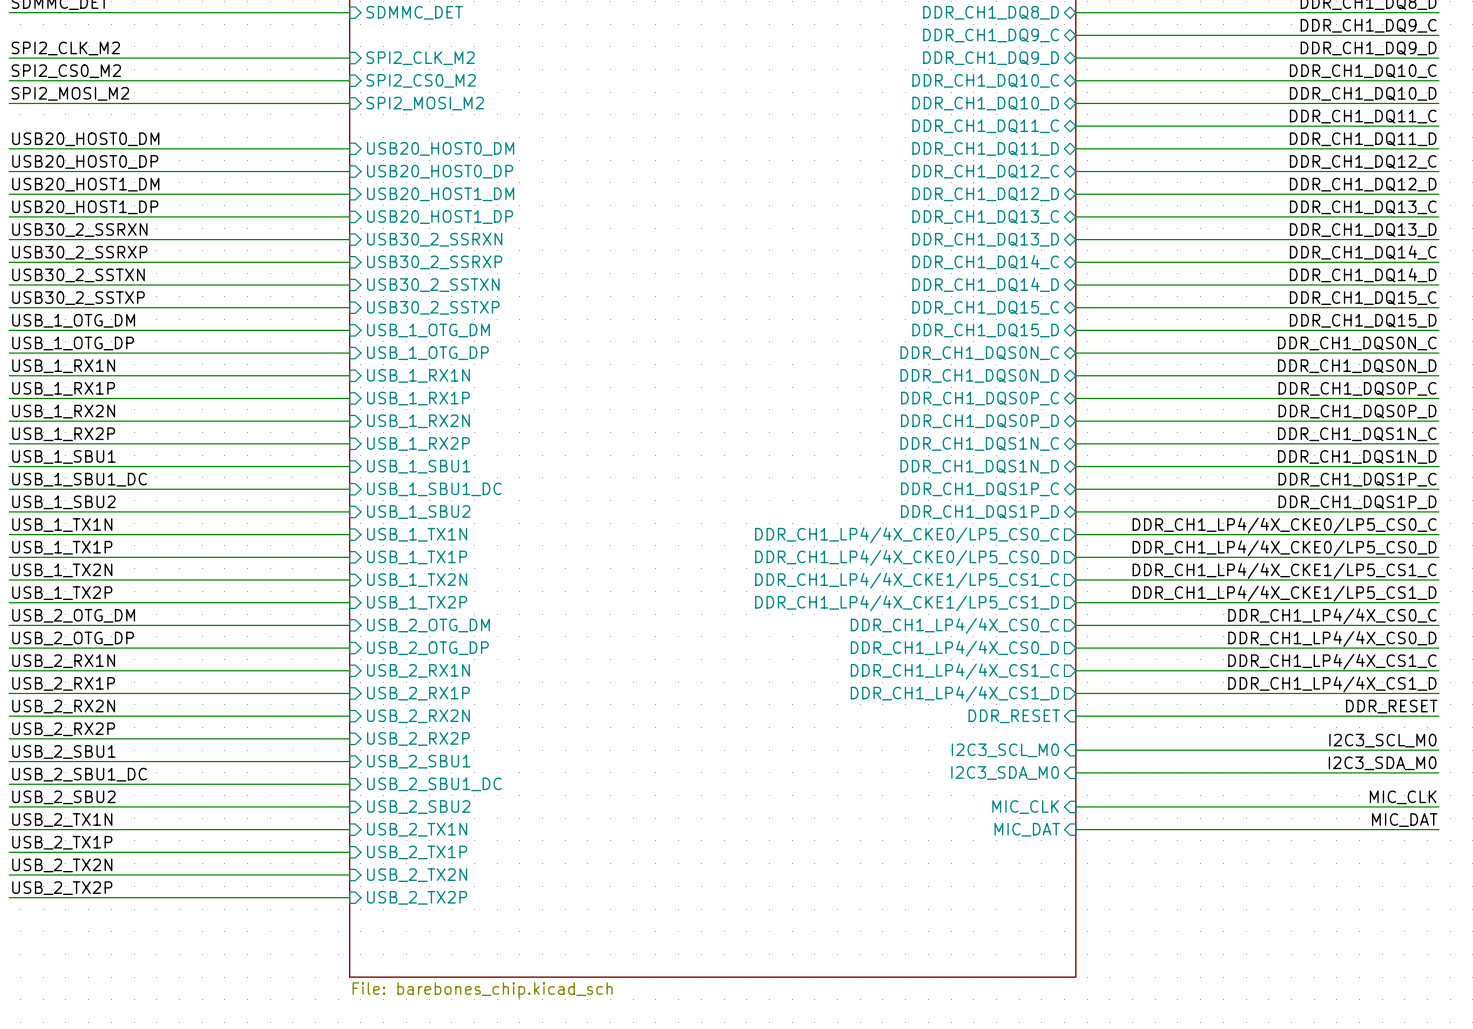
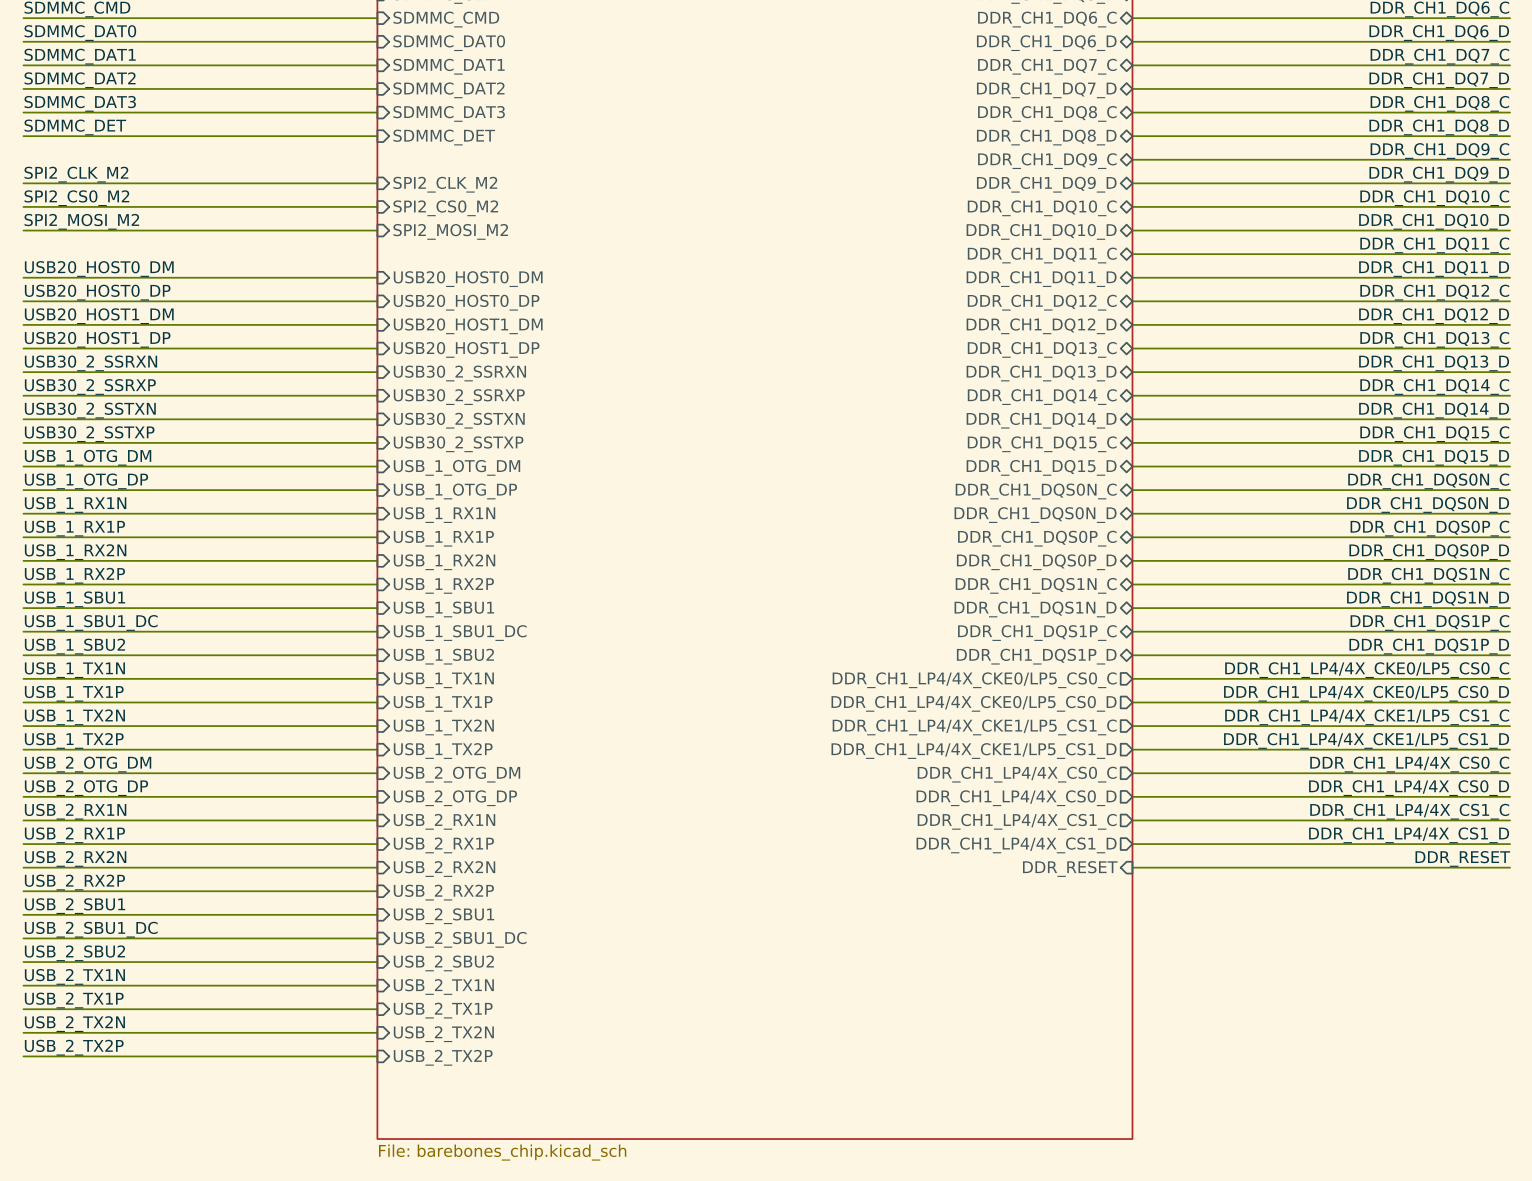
label: I2C3_SCL_M0 (1382, 740) -> none
sheet pin: I2C3_SCL_M0 (1005, 750) -> none
wire: (1075, 750) (1438, 750) -> none
label: I2C3_SDA_M0 (1382, 763) -> none
wire: (1075, 772) (1438, 772) -> none
sheet pin: I2C3_SDA_M0 (1005, 773) -> none
label: MIC_CLK (1403, 797) -> none
wire: (1075, 806) (1438, 806) -> none
sheet pin: MIC_CLK (1025, 807) -> none
label: MIC_DAT (1404, 820) -> none
sheet pin: MIC_DAT (1027, 829) -> none
wire: (1075, 829) (1438, 829) -> none

